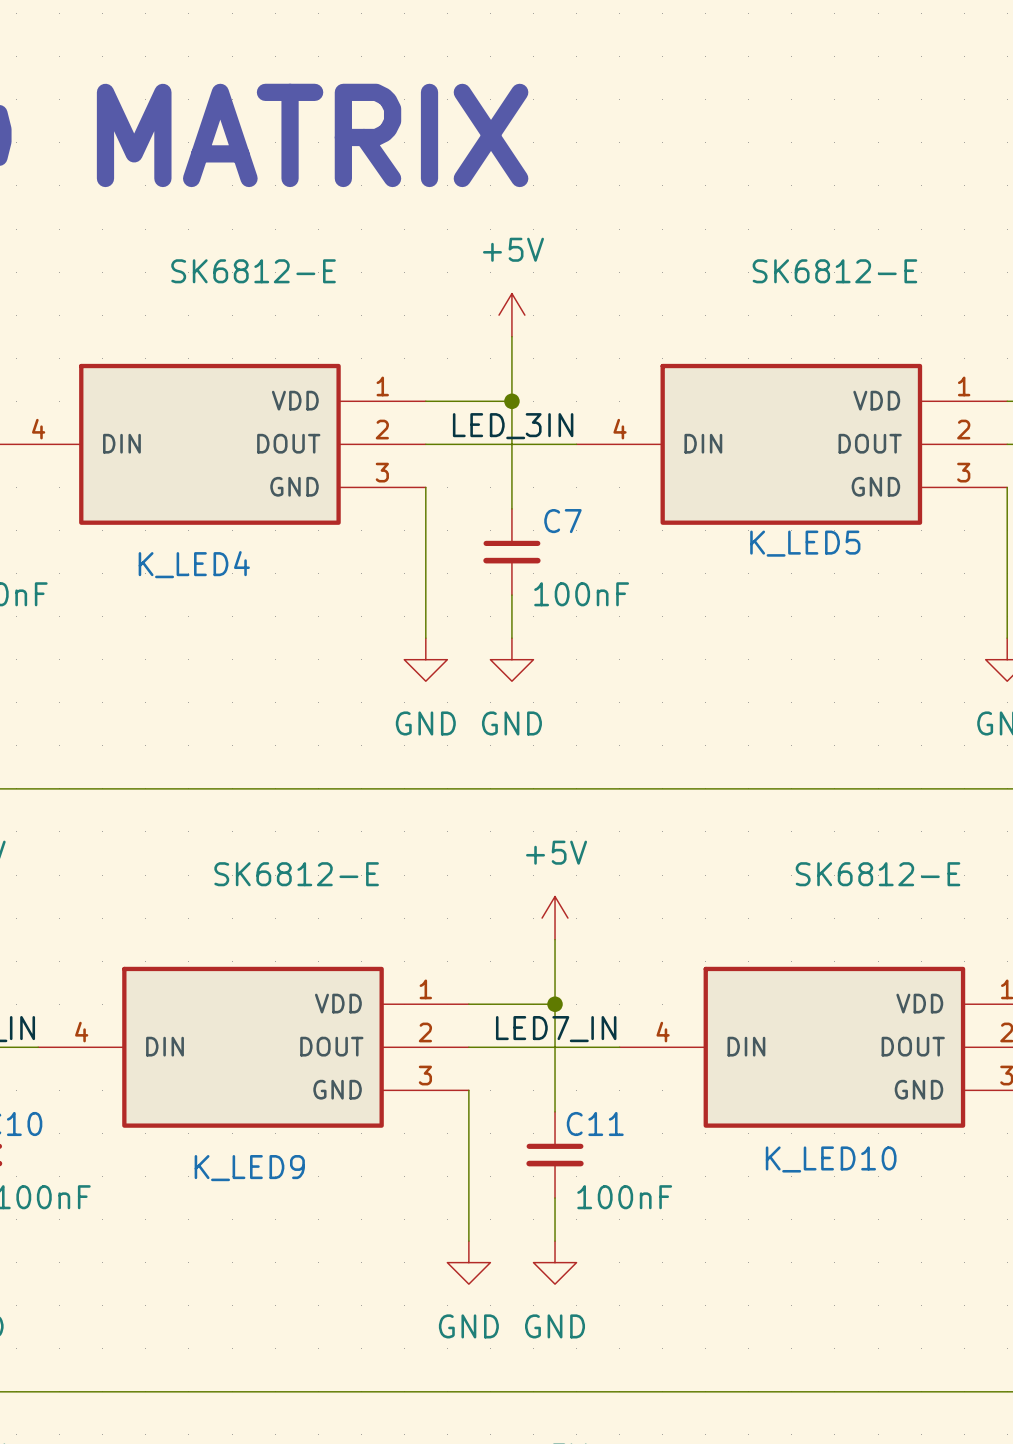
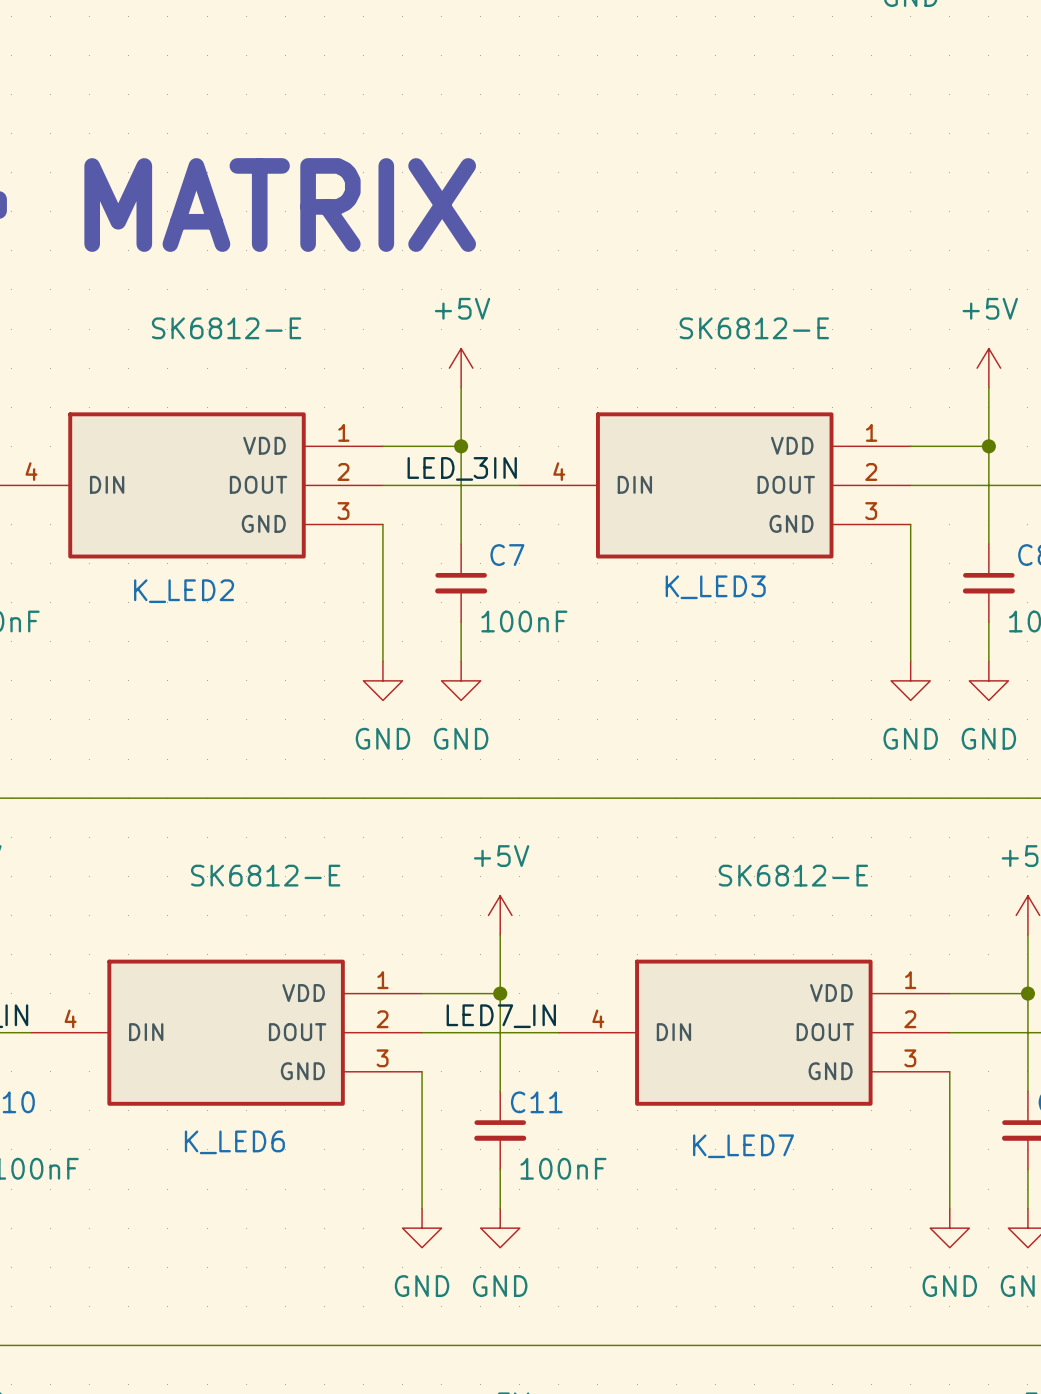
K_LED5 name: K_LED5 (805, 543) -> K_LED3 (715, 587)
K_LED4 name: K_LED4 (194, 564) -> K_LED2 (184, 591)
K_LED10 name: K_LED10 (831, 1159) -> K_LED7 (743, 1146)
K_LED9 name: K_LED9 (249, 1168) -> K_LED6 (234, 1142)

